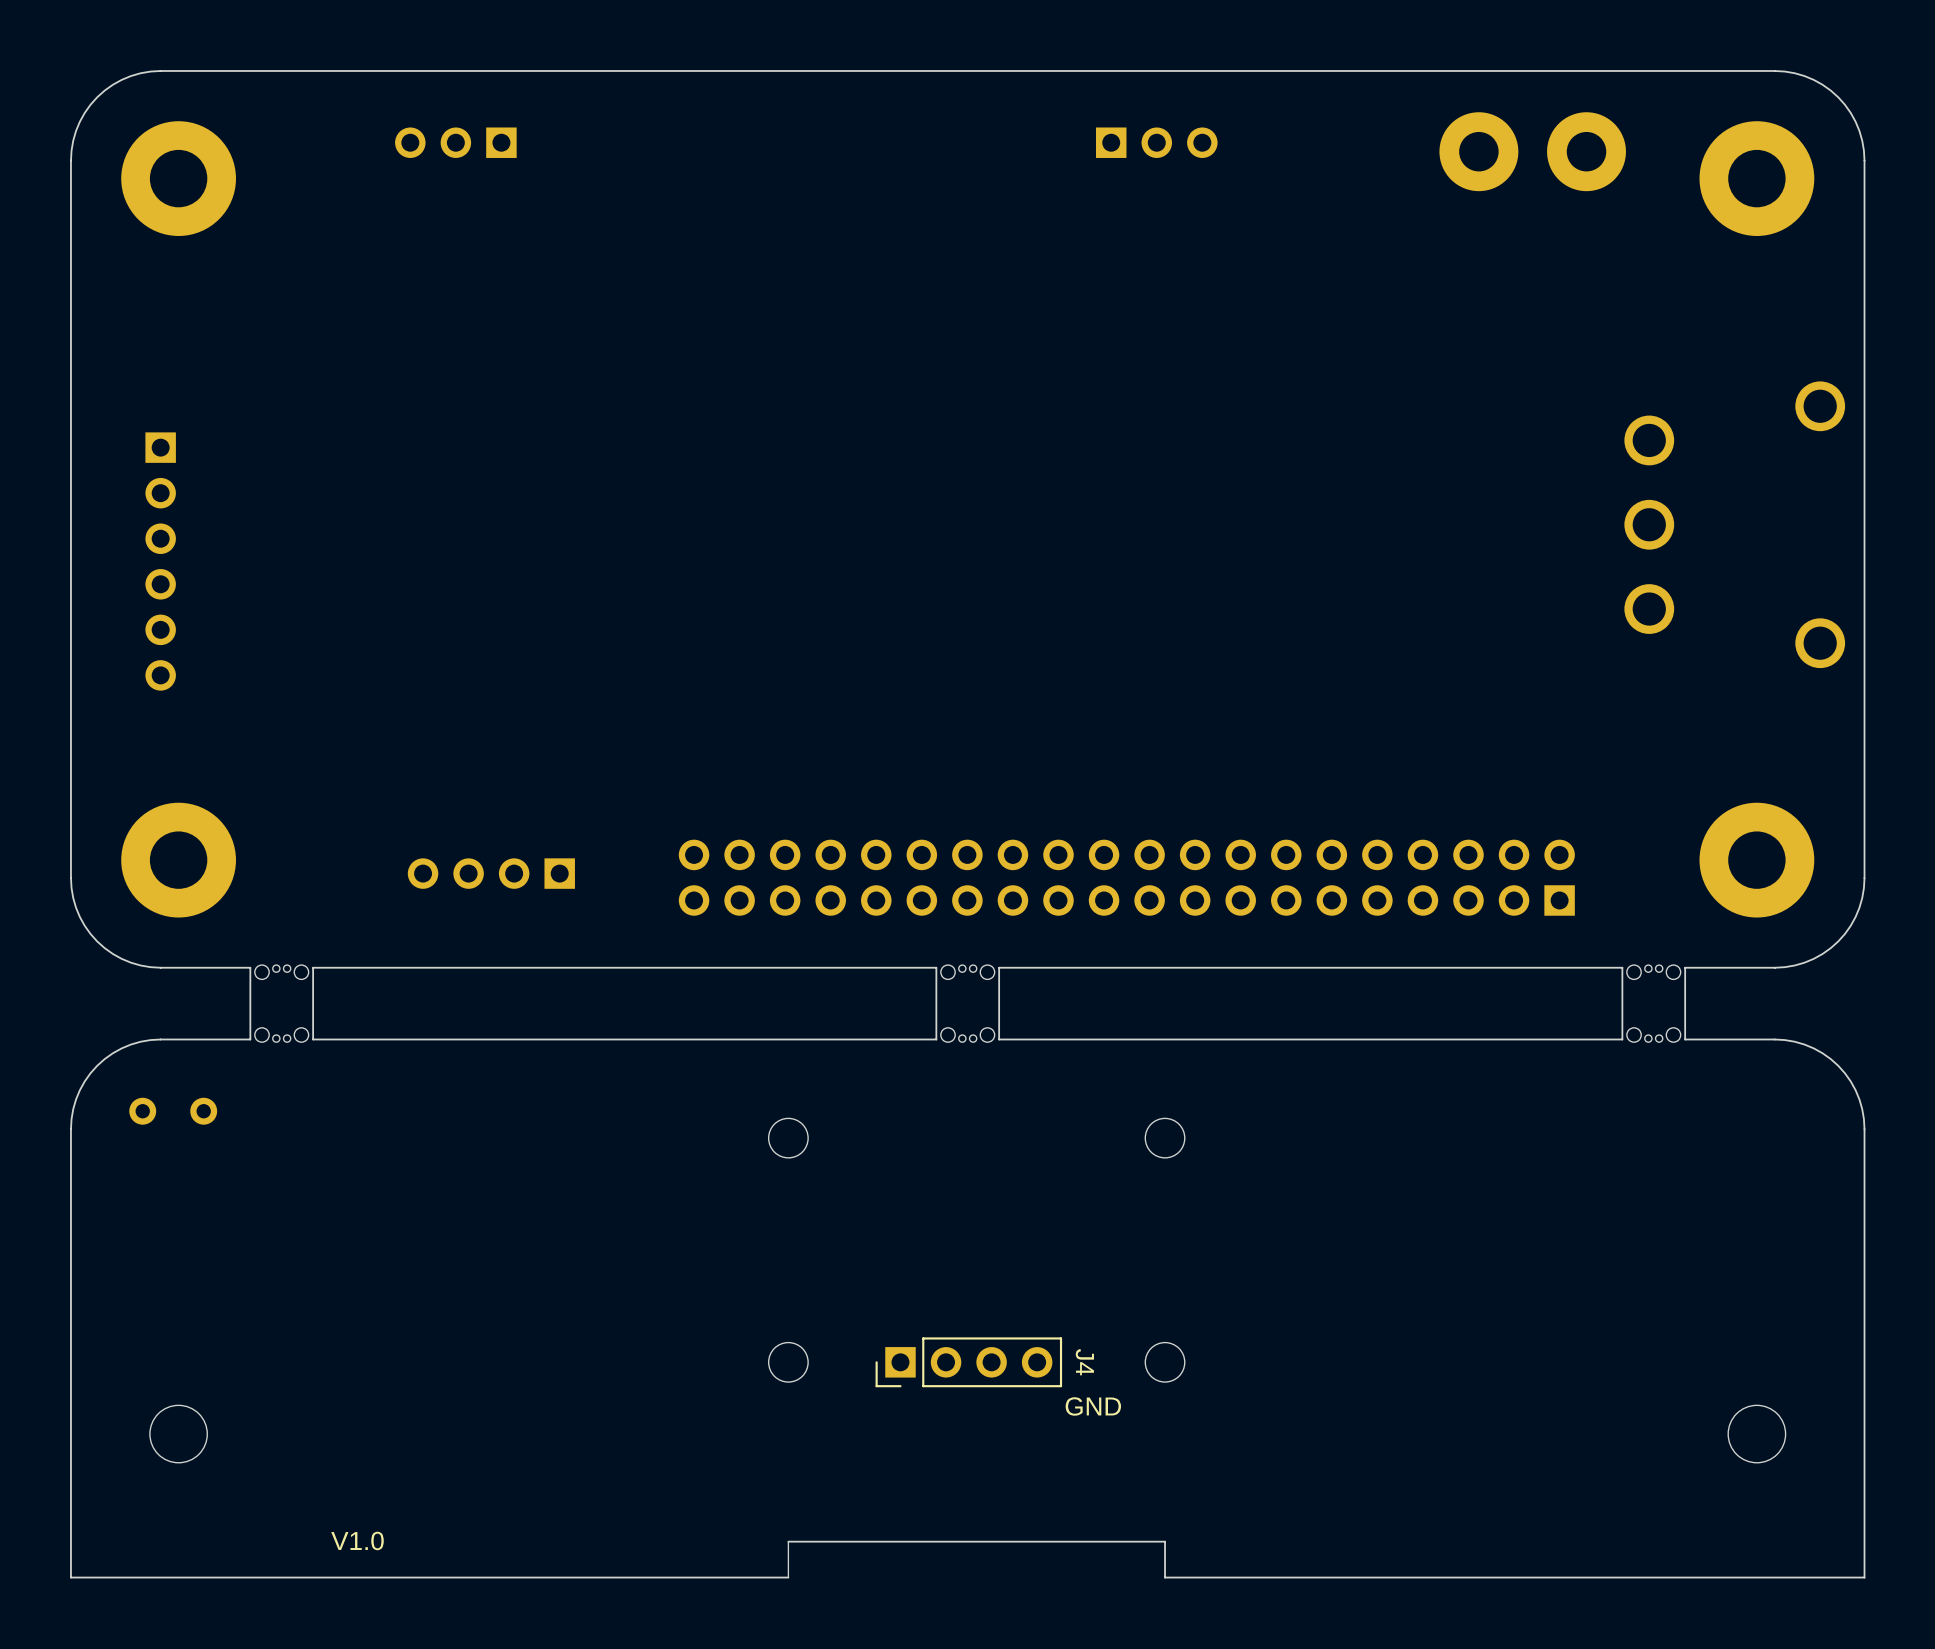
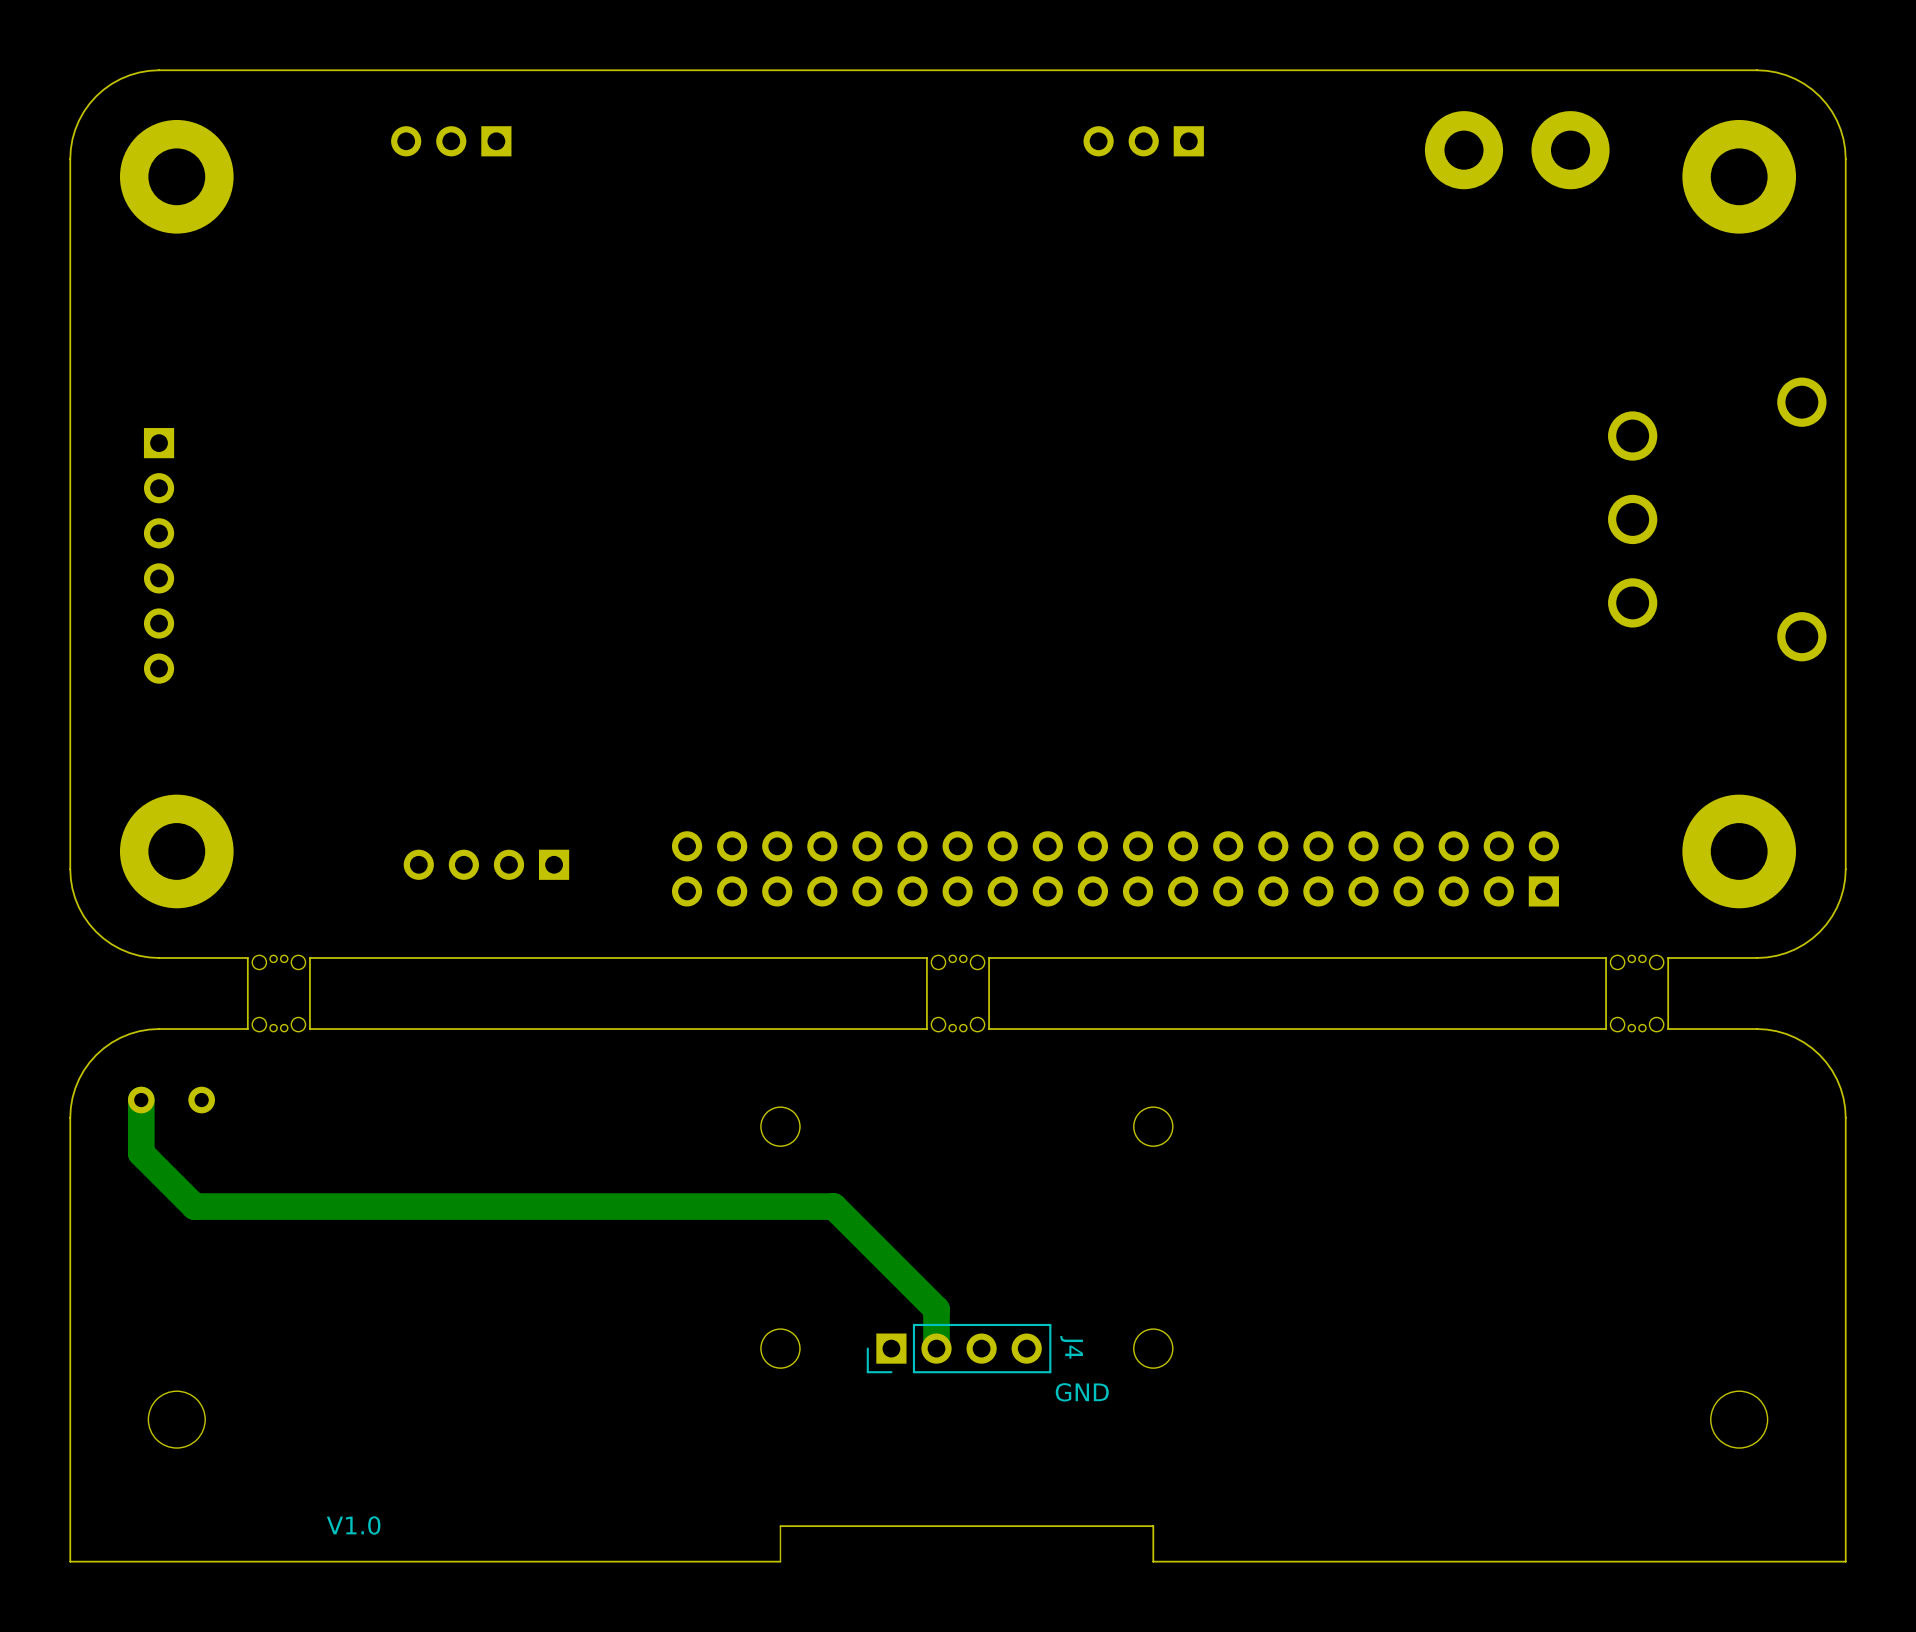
part rotation: 0° (1156, 142) -> 180° (1143, 141)
track: none -> (141, 1100) (141, 1153) (194, 1206) (833, 1206) (936, 1309) (936, 1348)

